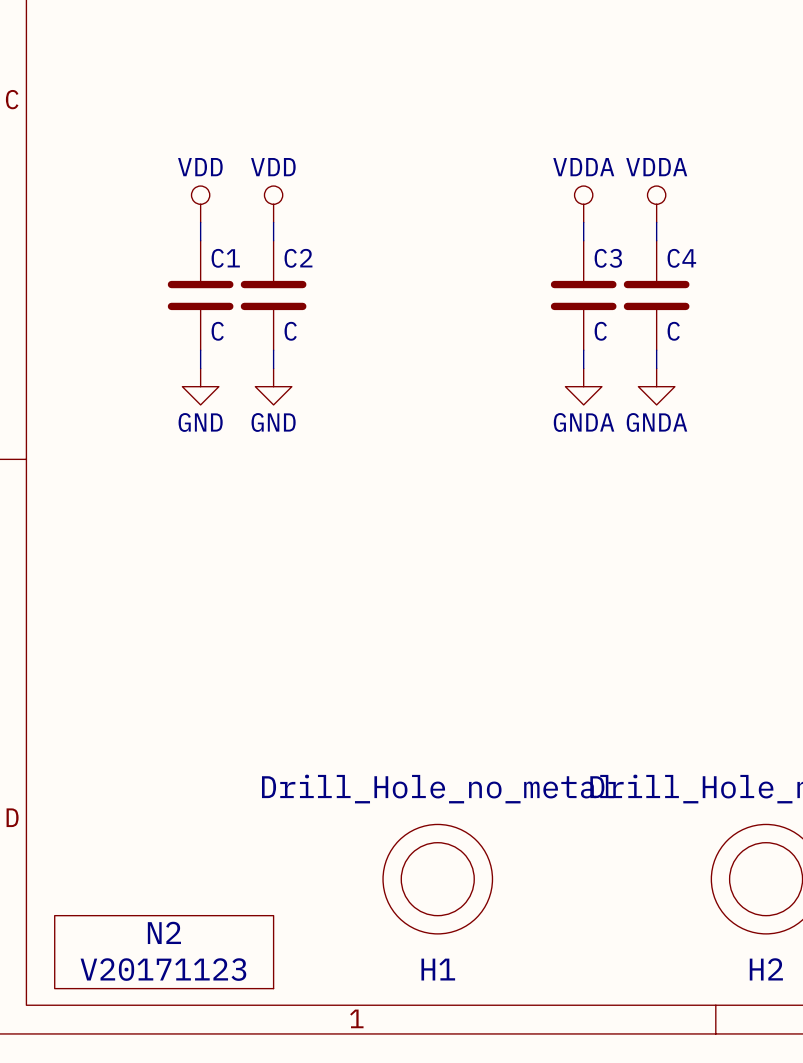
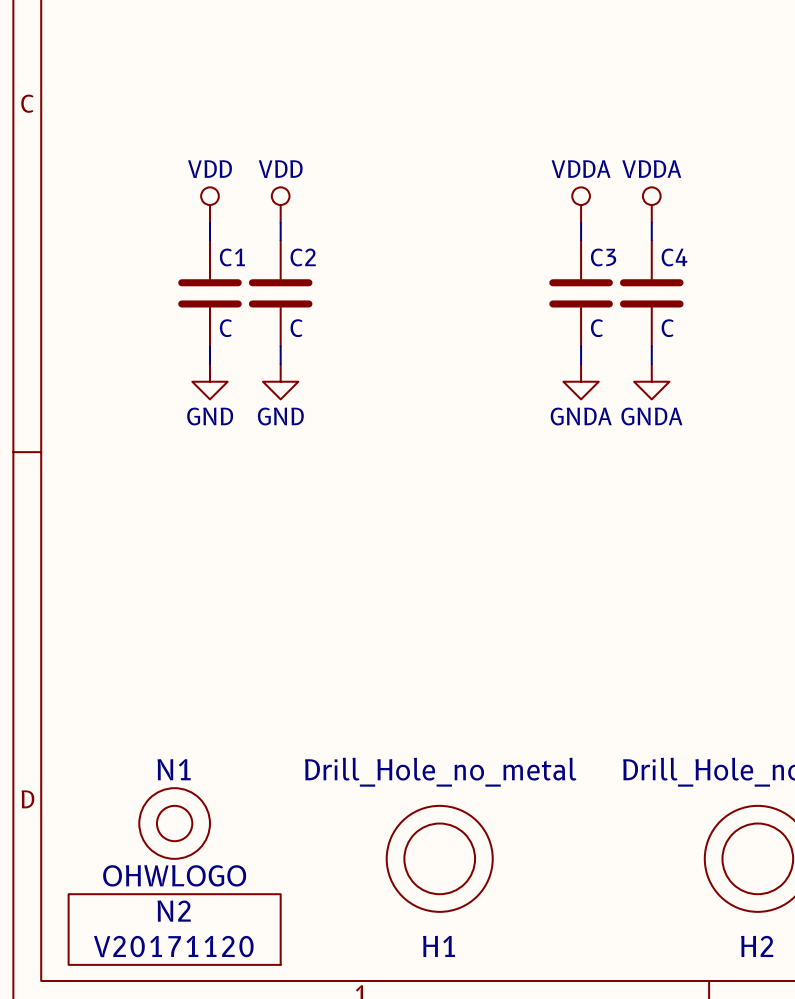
N1: none -> OHWLOGO (174, 823)
N2 value: V20171123 (163, 969) -> V20171120 (173, 946)

